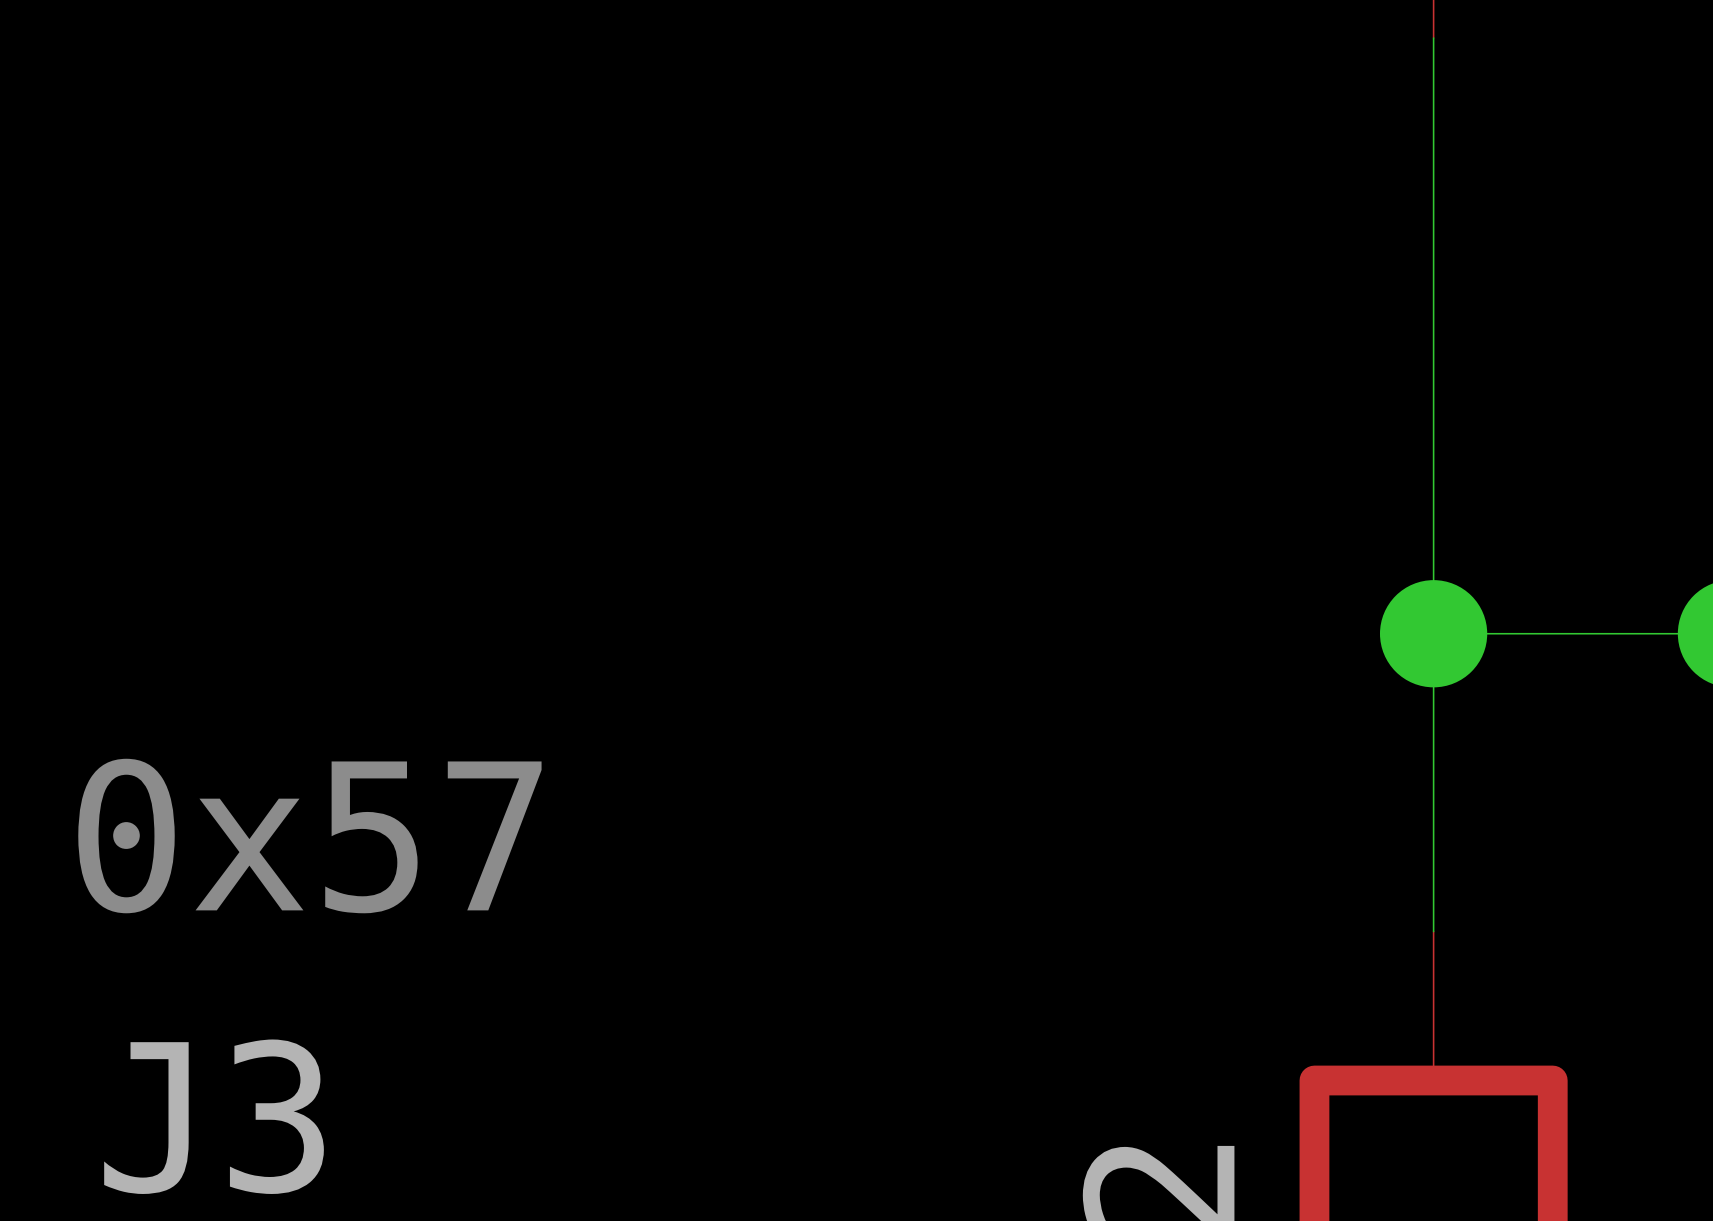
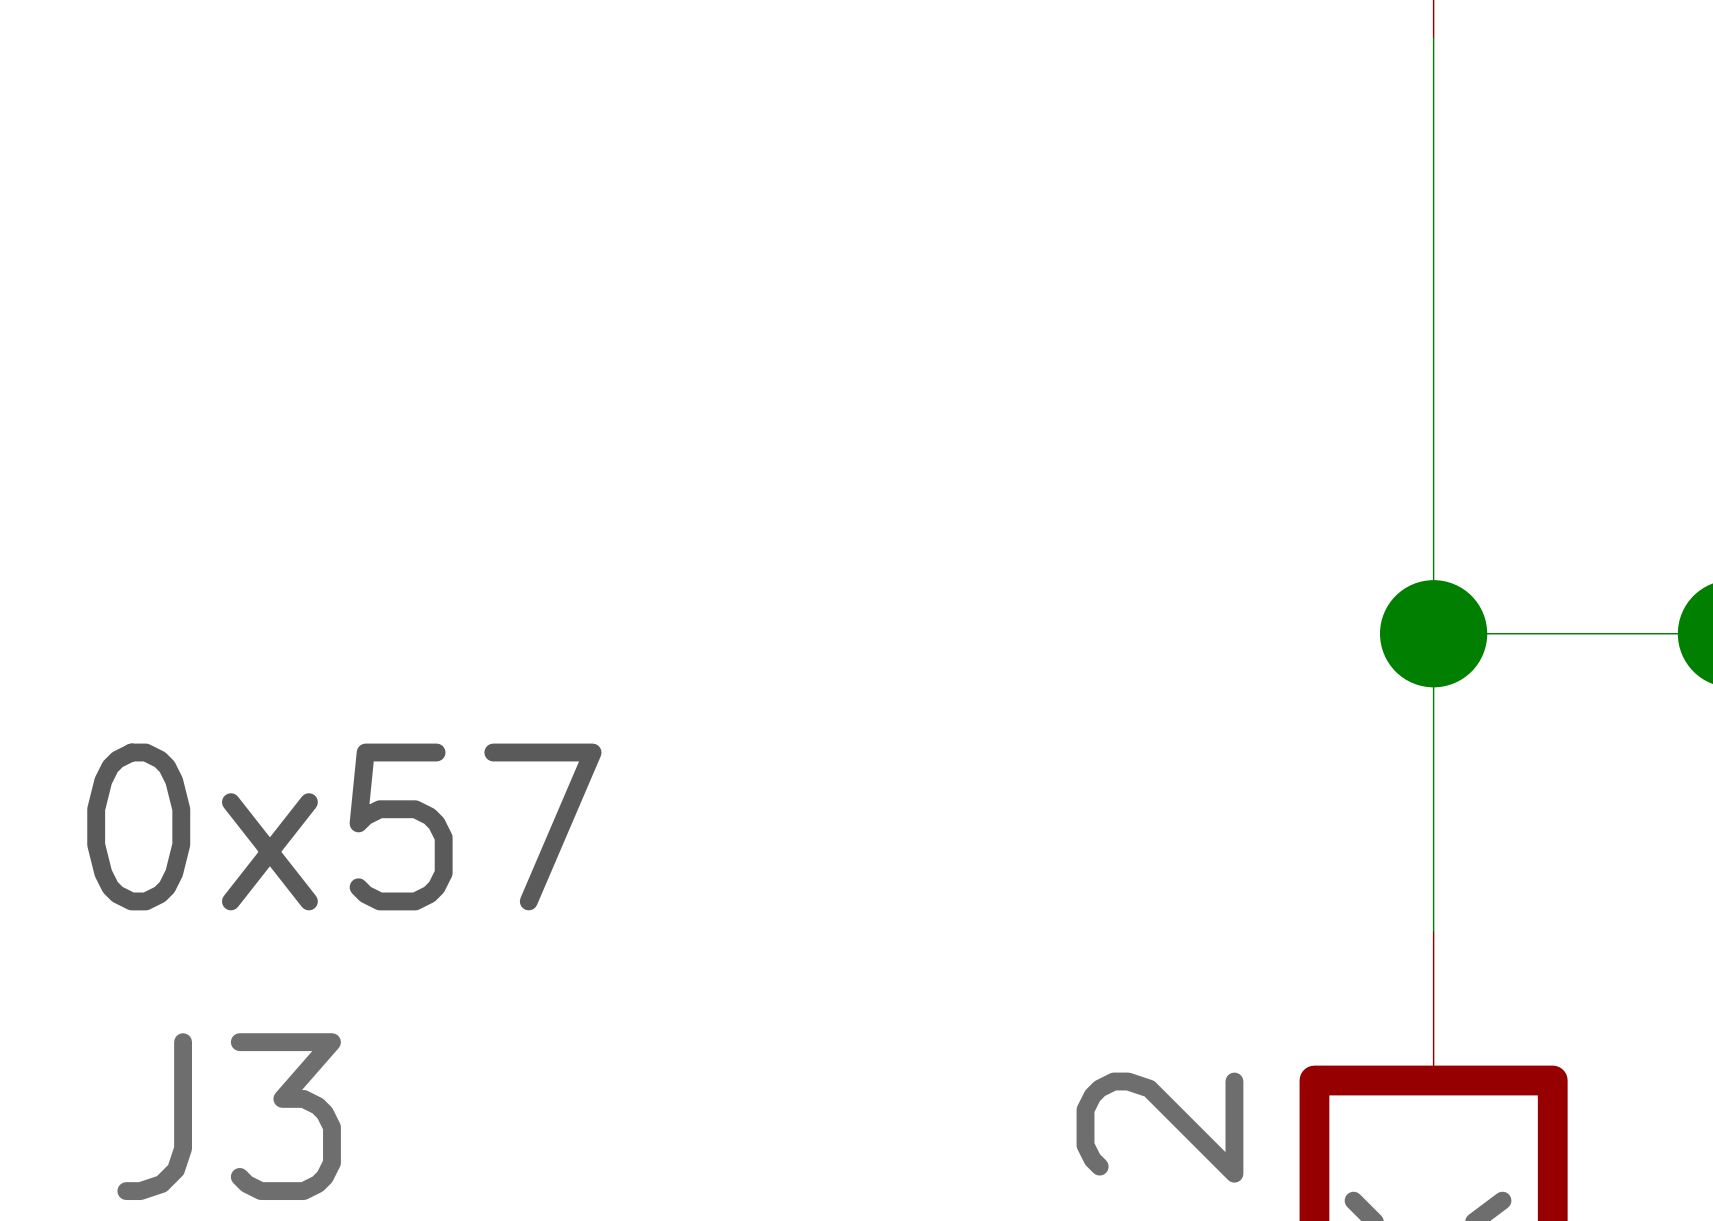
text position: 0x57 (309, 836) -> 0x57 (344, 826)

